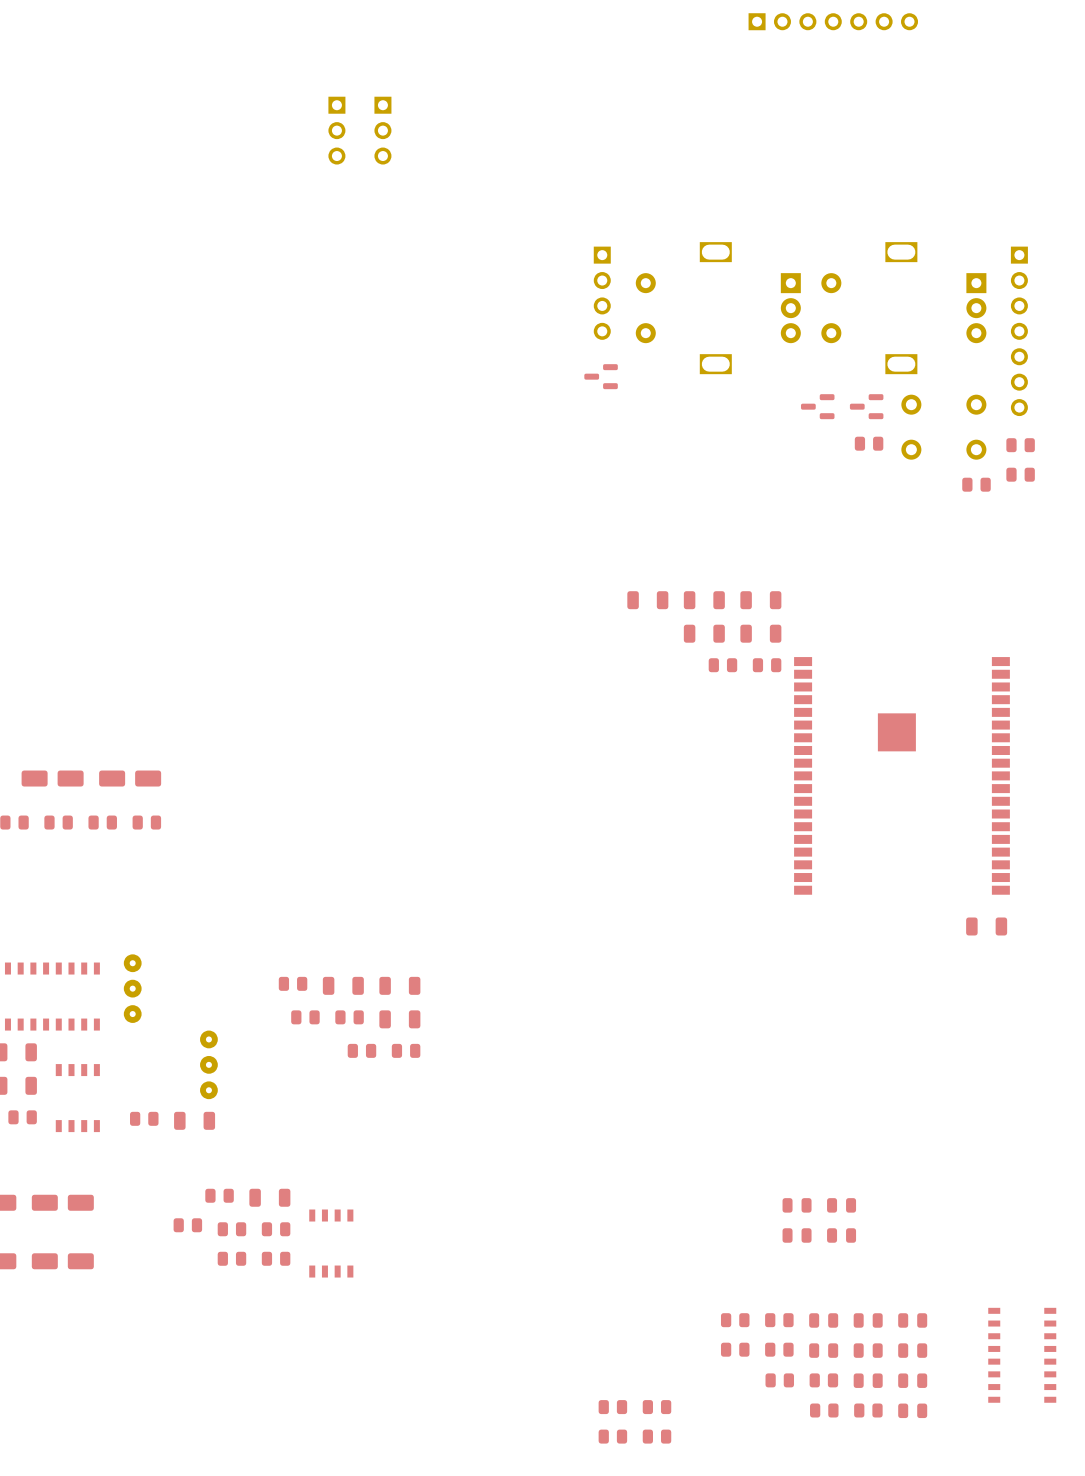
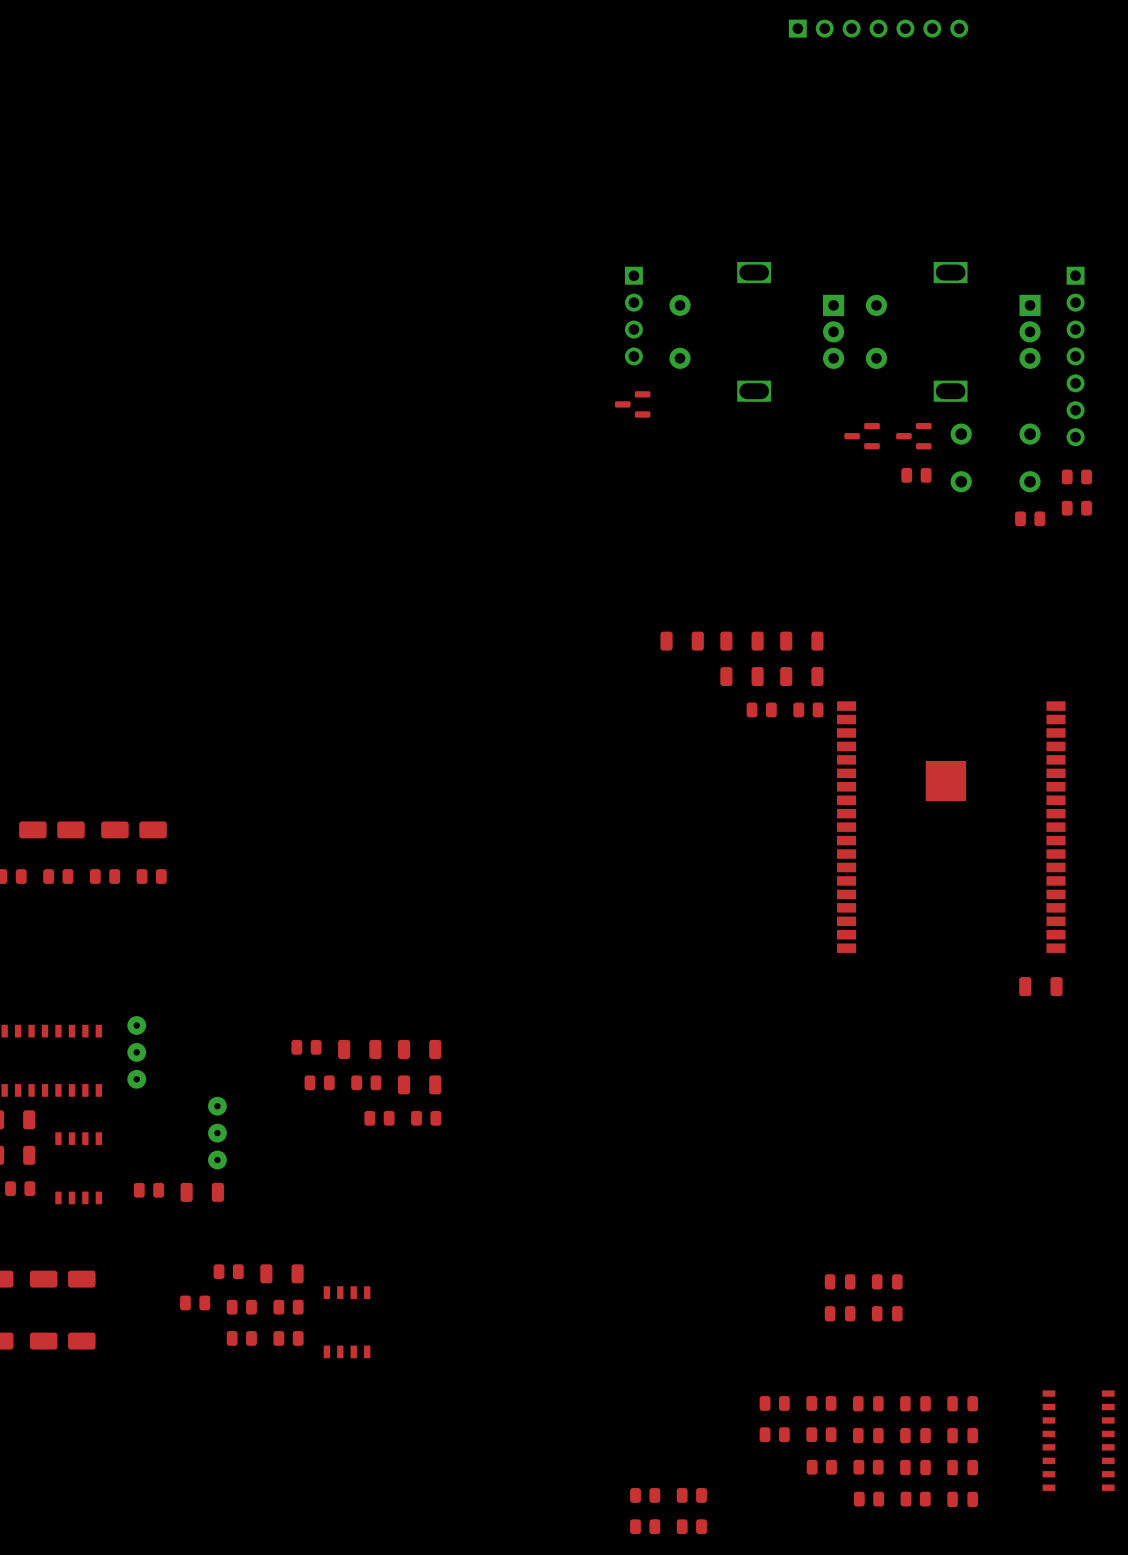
part: (336, 130) -> none
part: (382, 130) -> none

